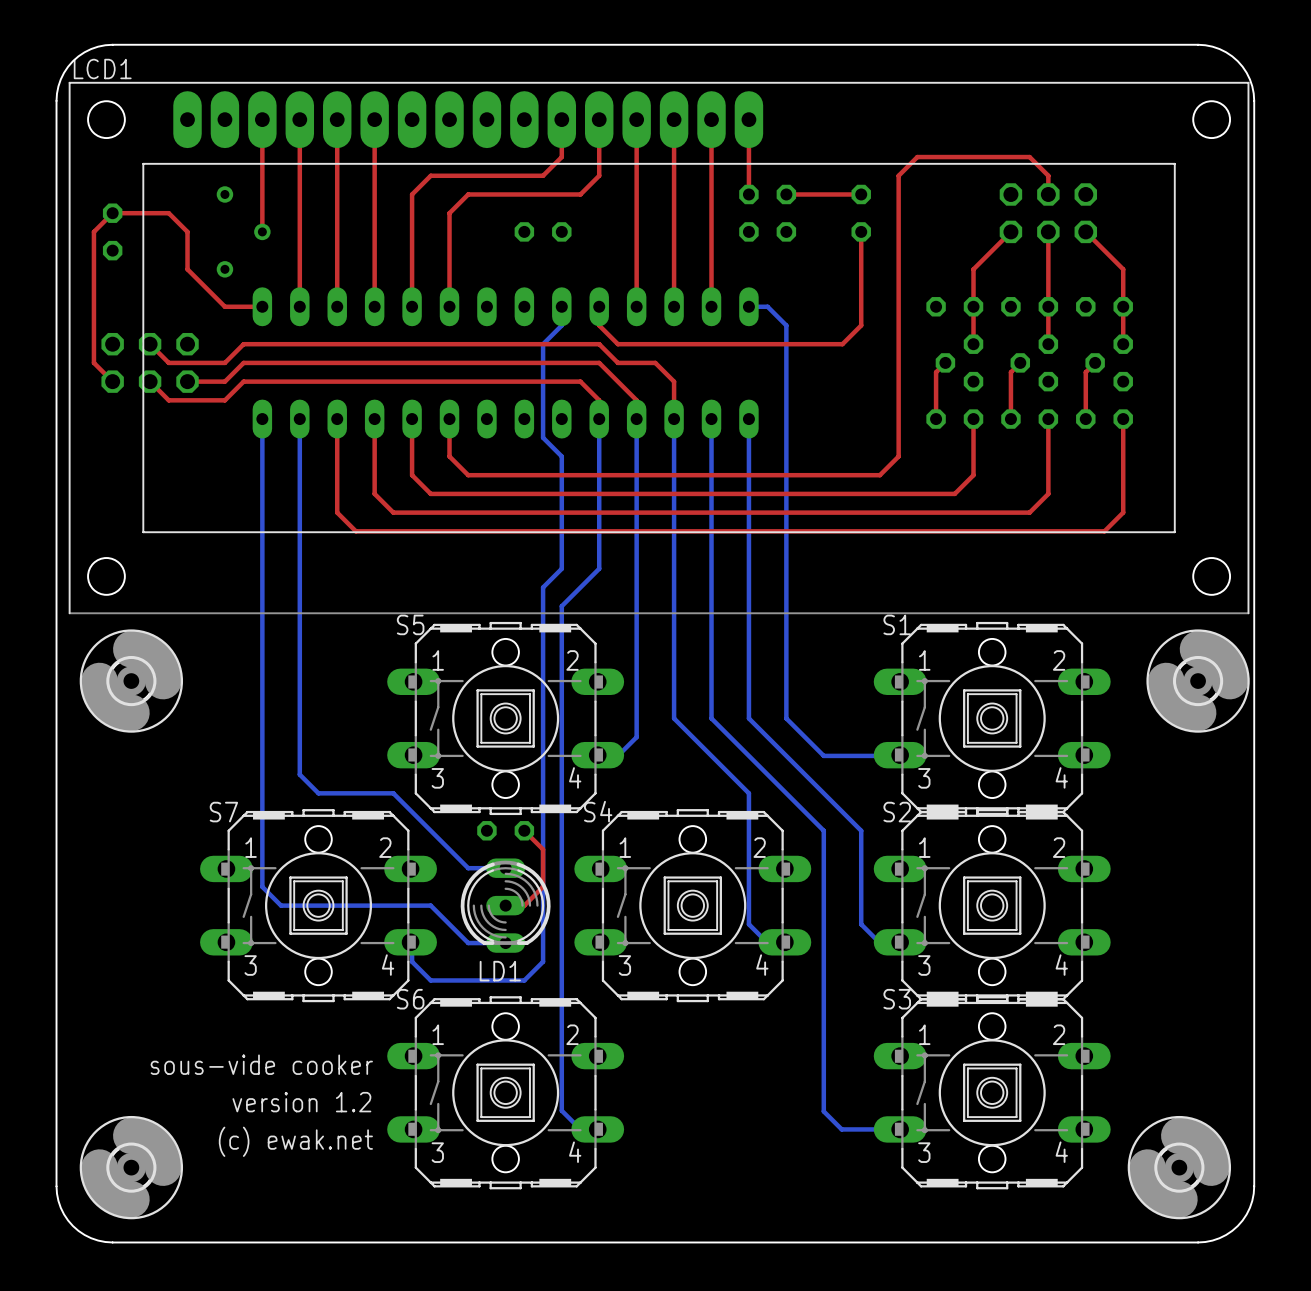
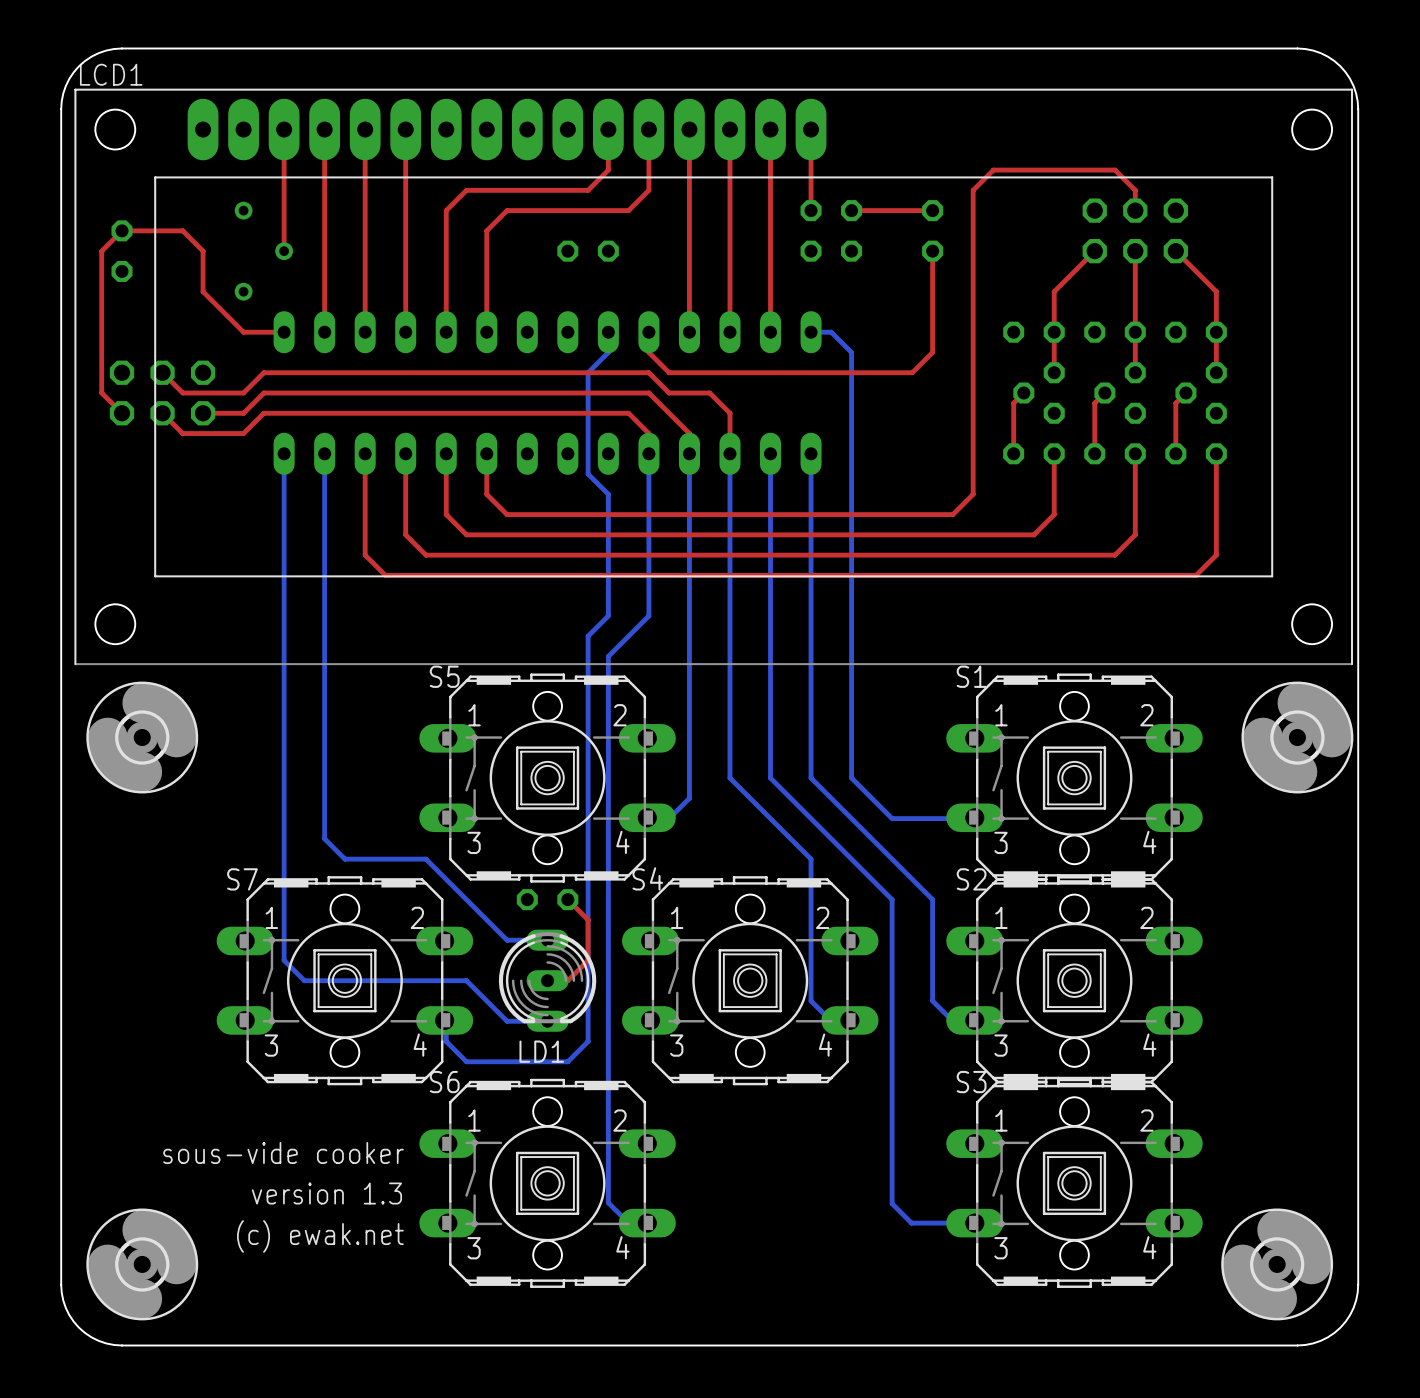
text: version 1.2 (301, 1102) -> version 1.3 (326, 1193)

